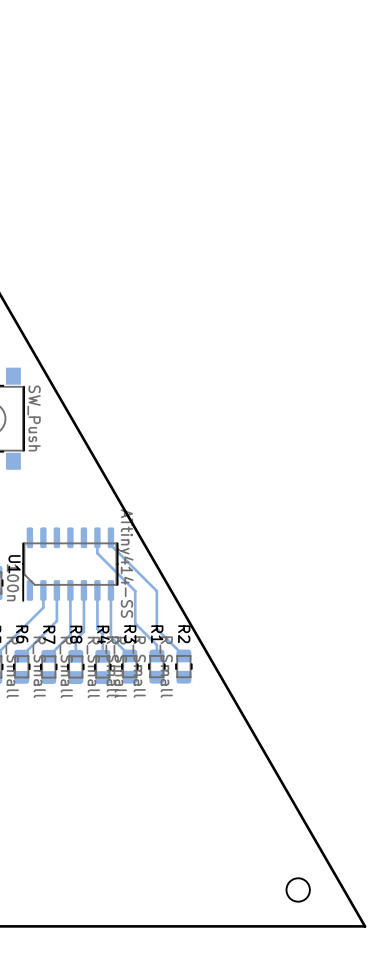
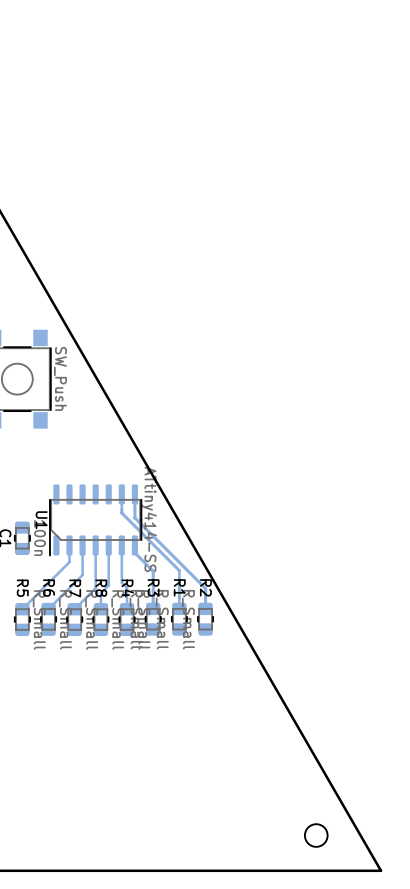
track: (110, 545) (156, 591) (156, 616) -> (121, 509) (121, 513) (179, 570)
track: none -> (134, 501) (134, 517) (205, 588) (205, 608)
track: (97, 553) (135, 591) (135, 623) (156, 645) -> none
track: (110, 598) (110, 637) (129, 655) -> (134, 552) (153, 571) (153, 608)
track: (156, 628) (183, 655) -> (179, 582) (179, 598)

